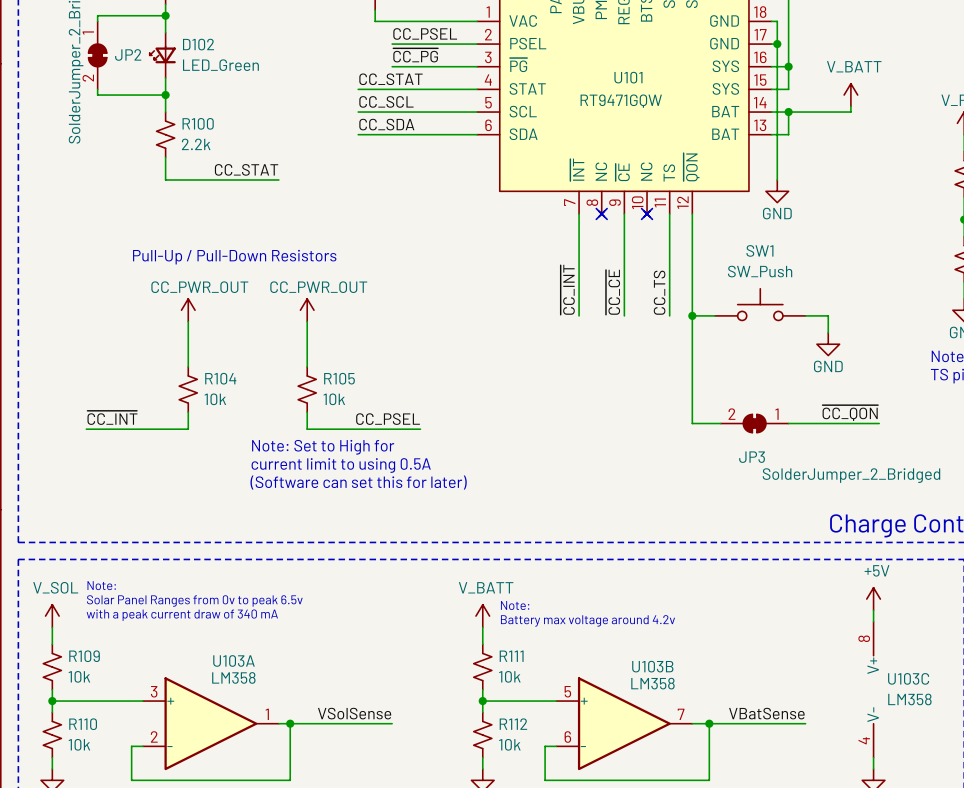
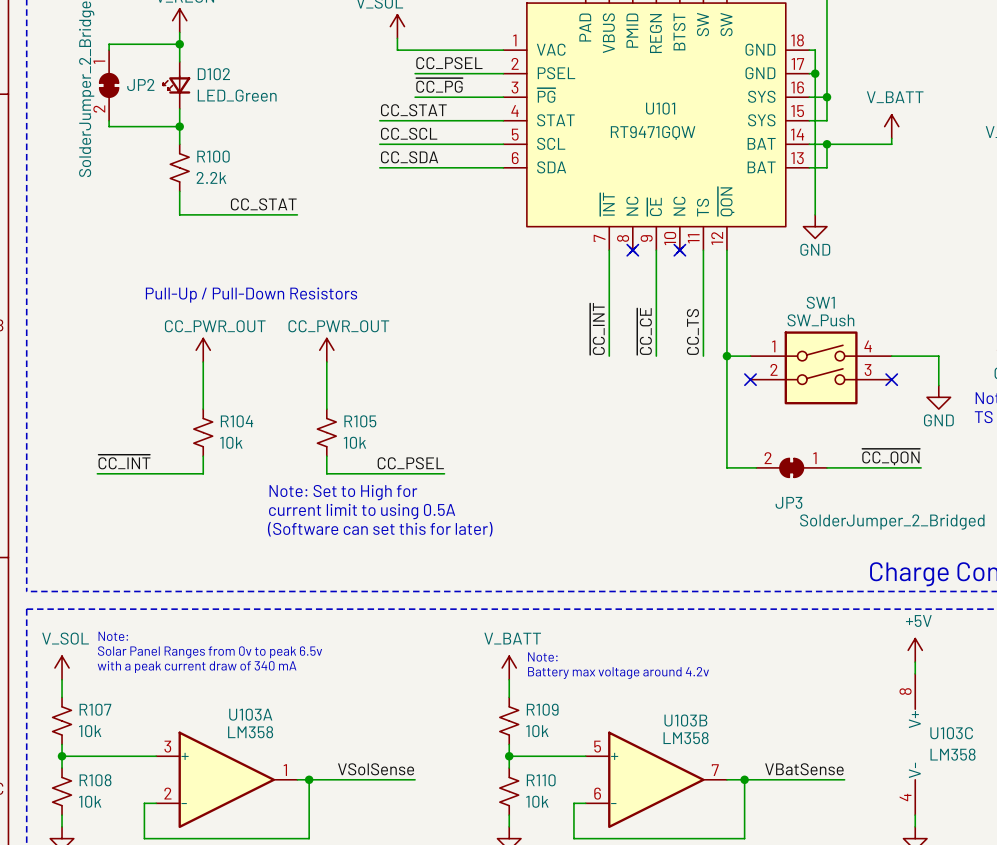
SW1 symbol: [714, 288, 806, 321] -> [750, 331, 892, 405]
wire: none -> (891, 356) (938, 356) (938, 385)
no-connect mark: none -> (750, 379)
no-connect mark: none -> (891, 379)
power symbol position: GND (828, 344) -> GND (938, 397)
R109 name: R109 (84, 656) -> R107 (95, 709)
R111 name: R111 (511, 656) -> R109 (542, 709)
R110 name: R110 (83, 724) -> R108 (95, 780)
R112 name: R112 (513, 724) -> R110 (541, 780)

